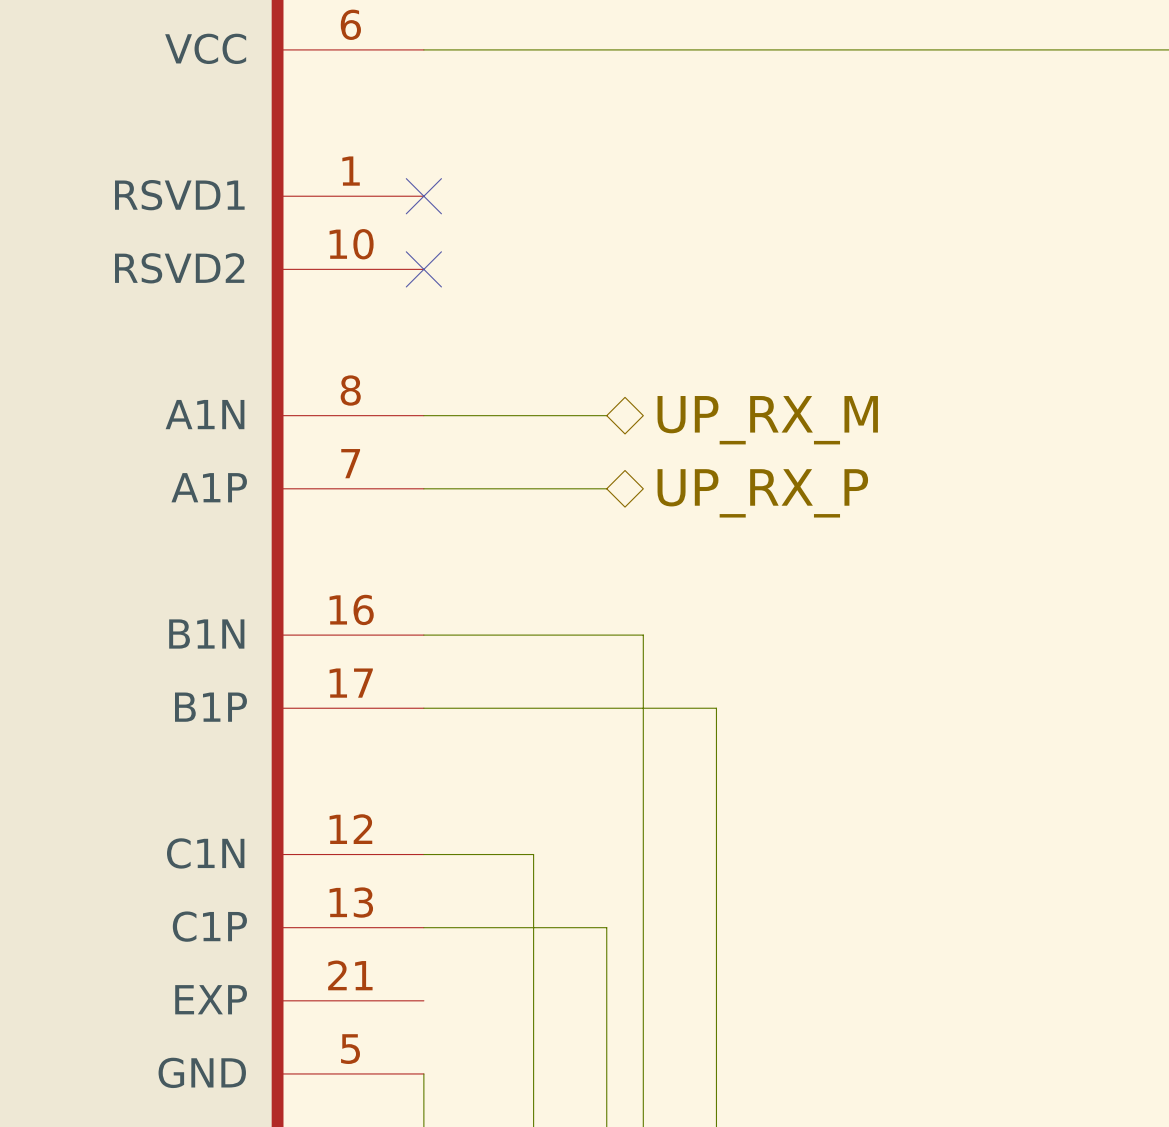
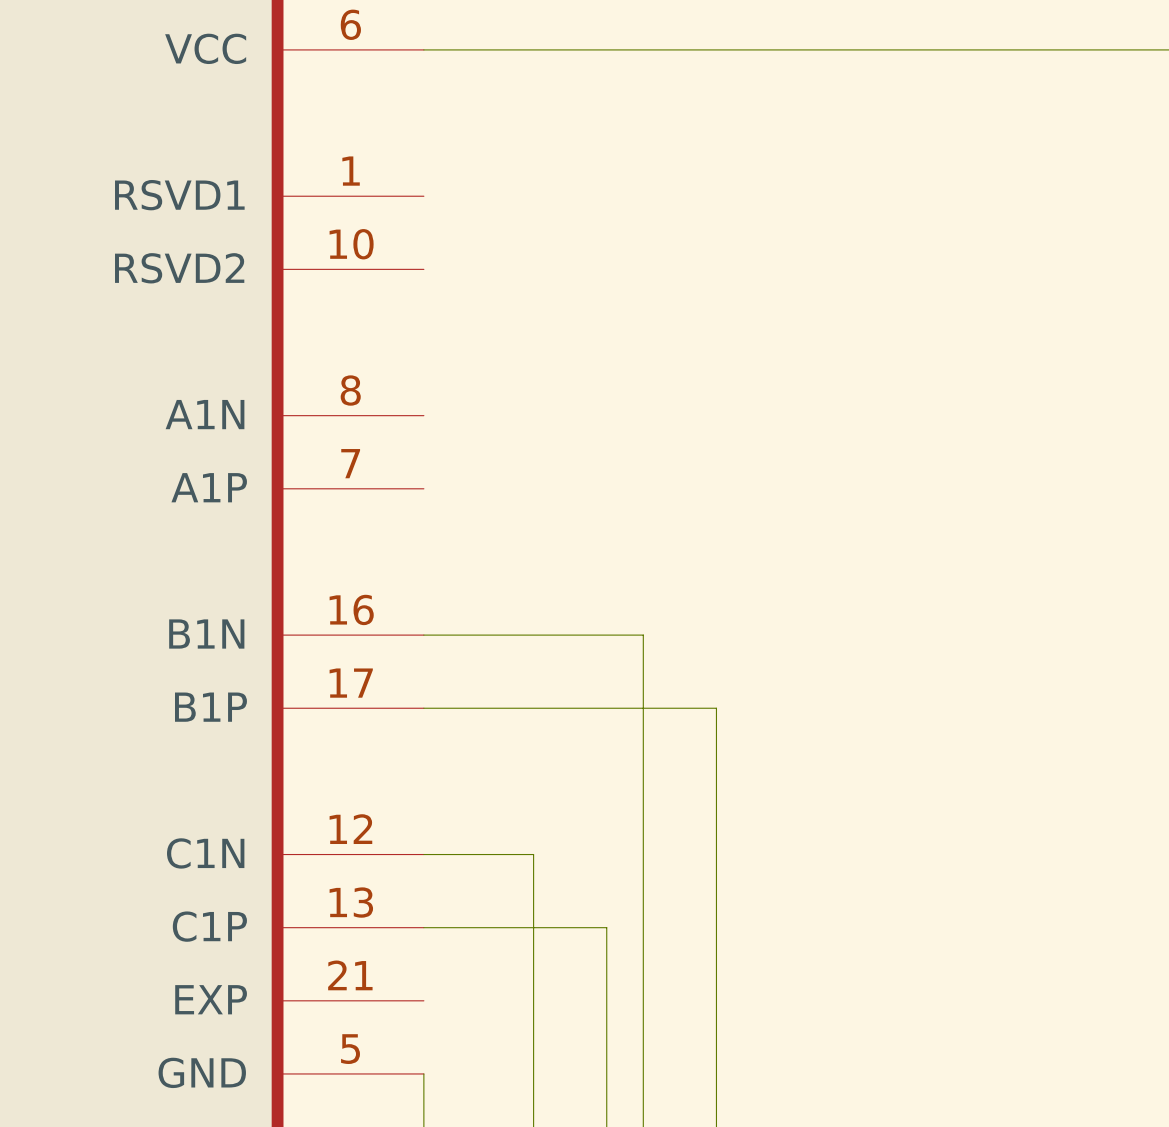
no-connect mark: (423, 196) -> none
no-connect mark: (423, 269) -> none
wire: (423, 415) (606, 415) -> none
hierarchical label: UP_RX_M (767, 420) -> none
wire: (423, 488) (606, 488) -> none
hierarchical label: UP_RX_P (762, 493) -> none

